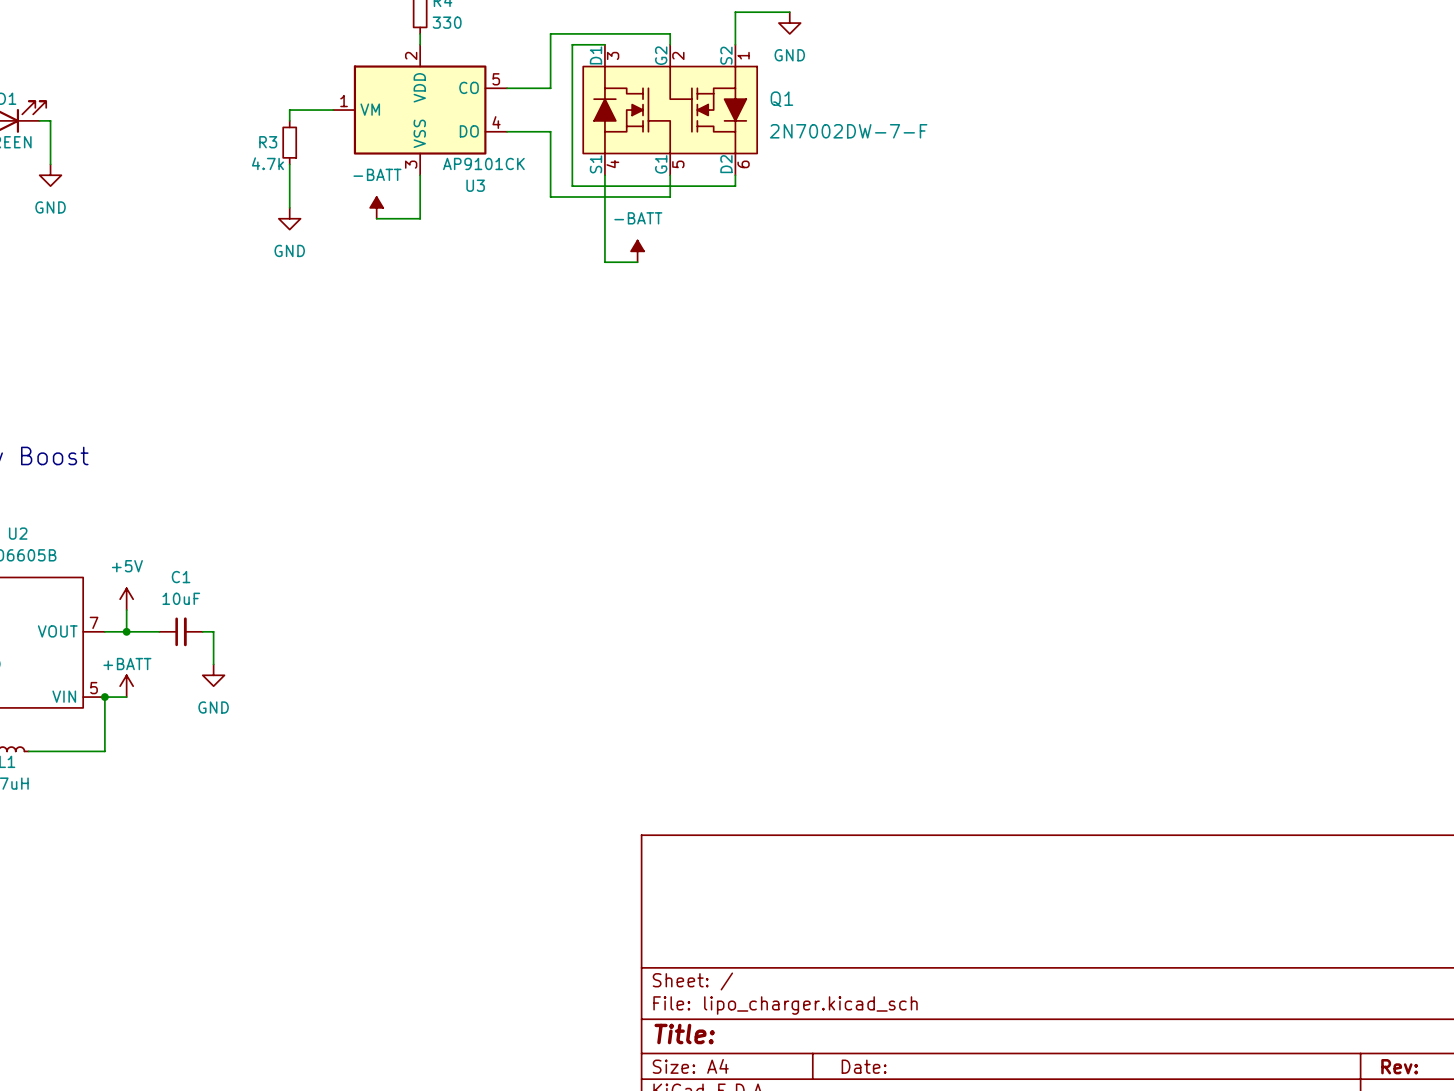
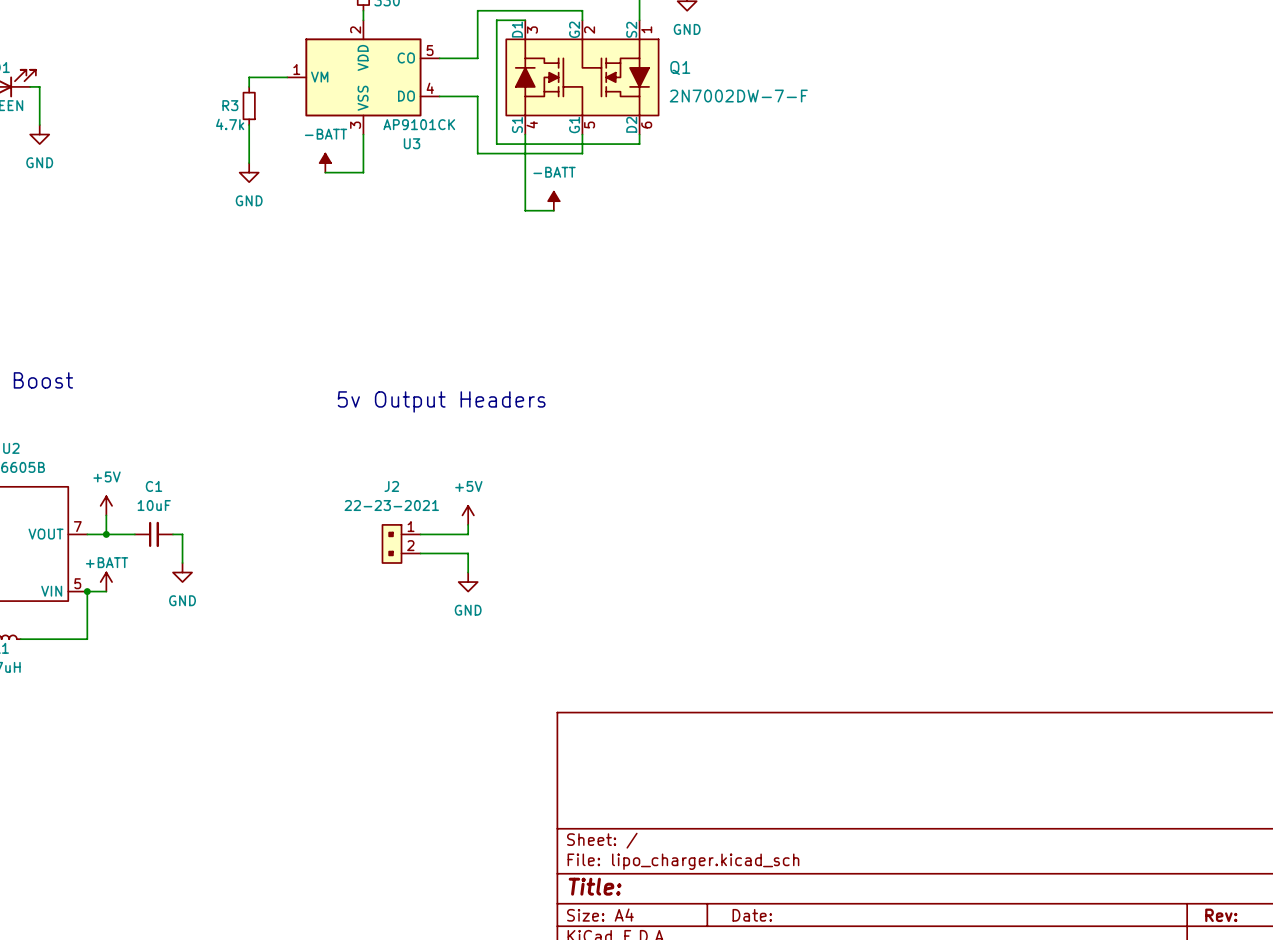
text: none -> 5v Output Headers (441, 401)
power symbol: none -> +5V (468, 515)
wire: none -> (468, 524) (468, 534) (420, 534)
J2: none -> 22-23-2021 (401, 543)
wire: none -> (420, 553) (468, 553) (468, 572)
power symbol: none -> GND (468, 582)

